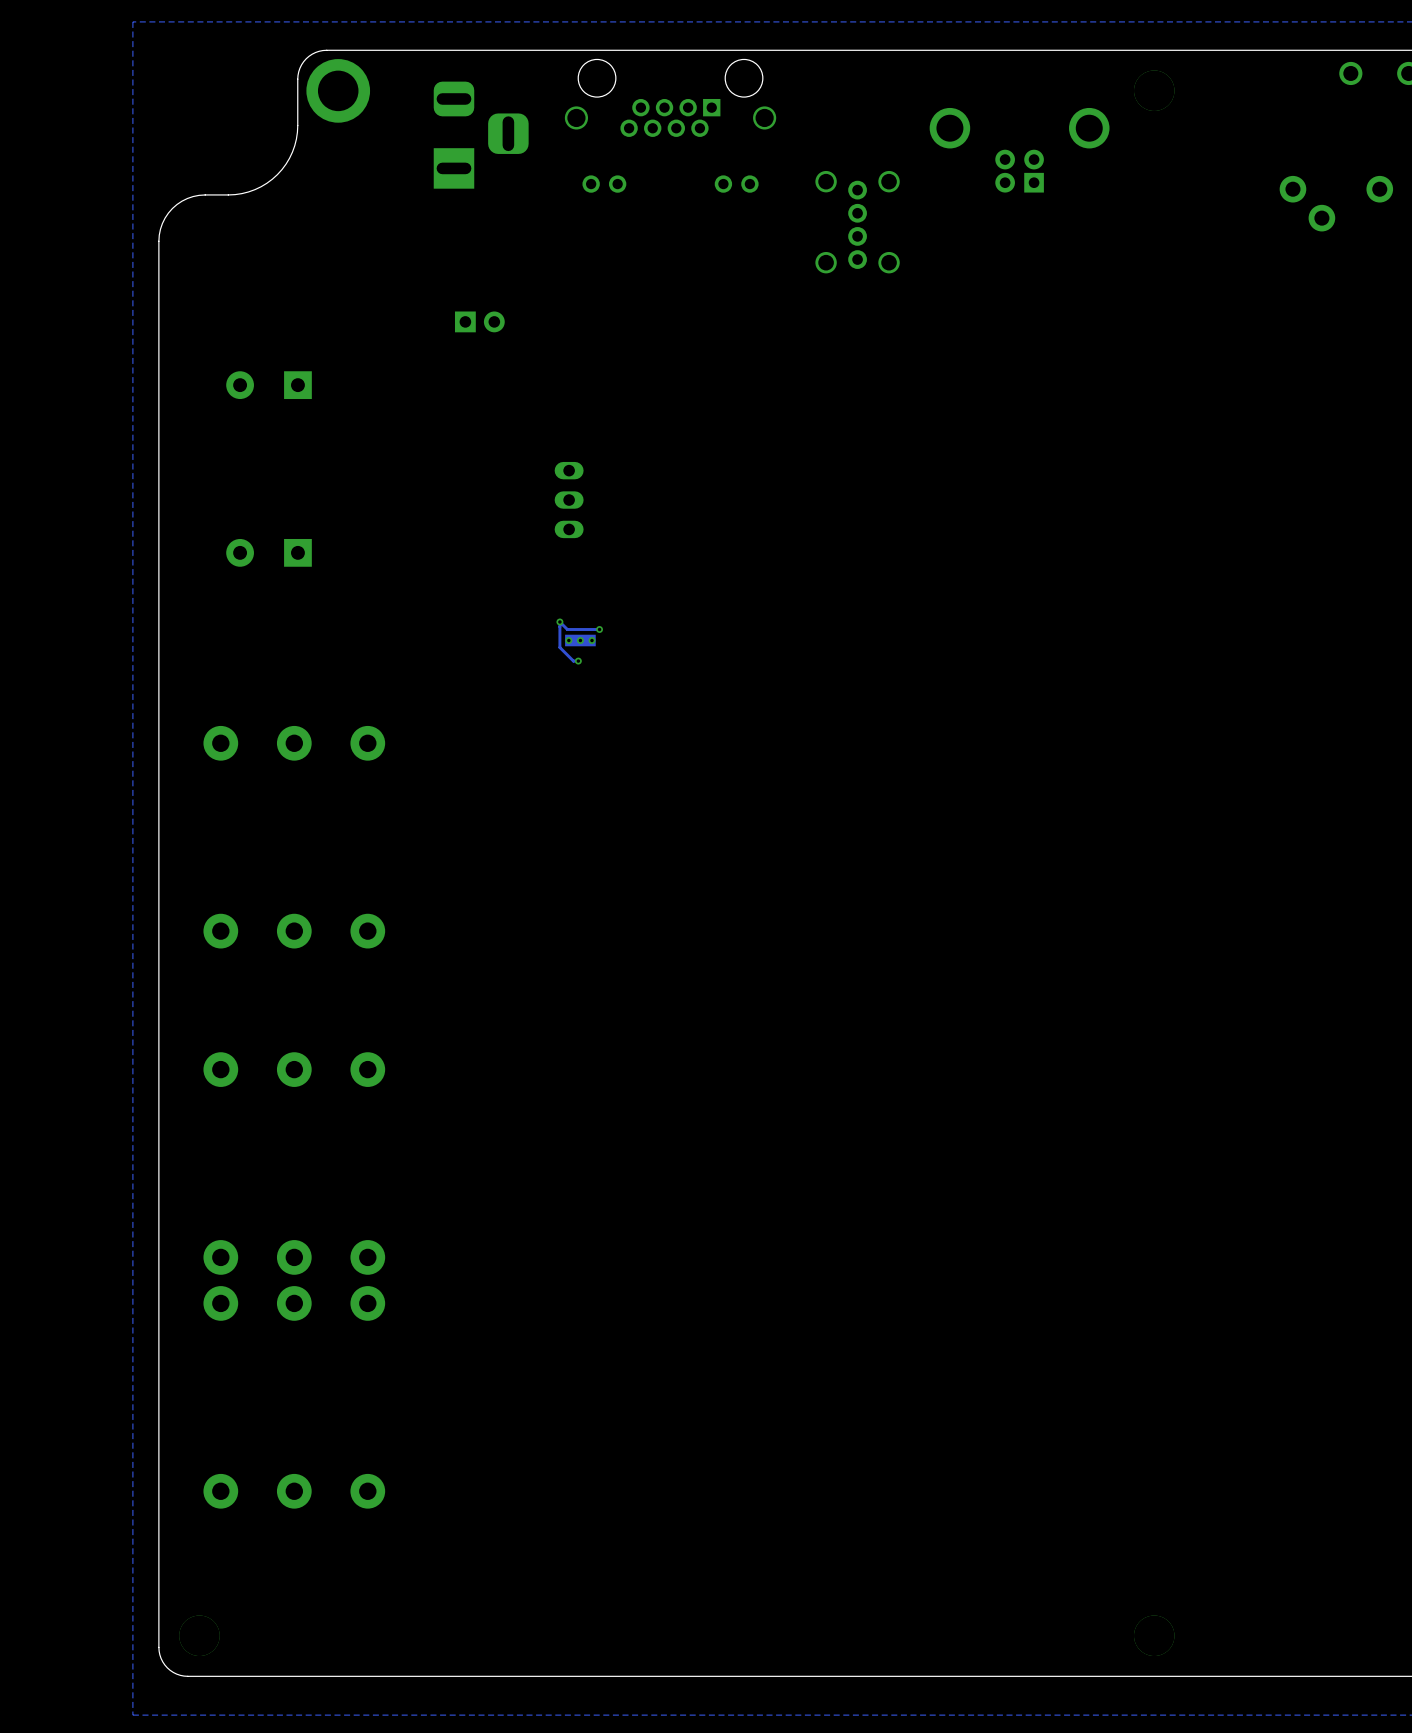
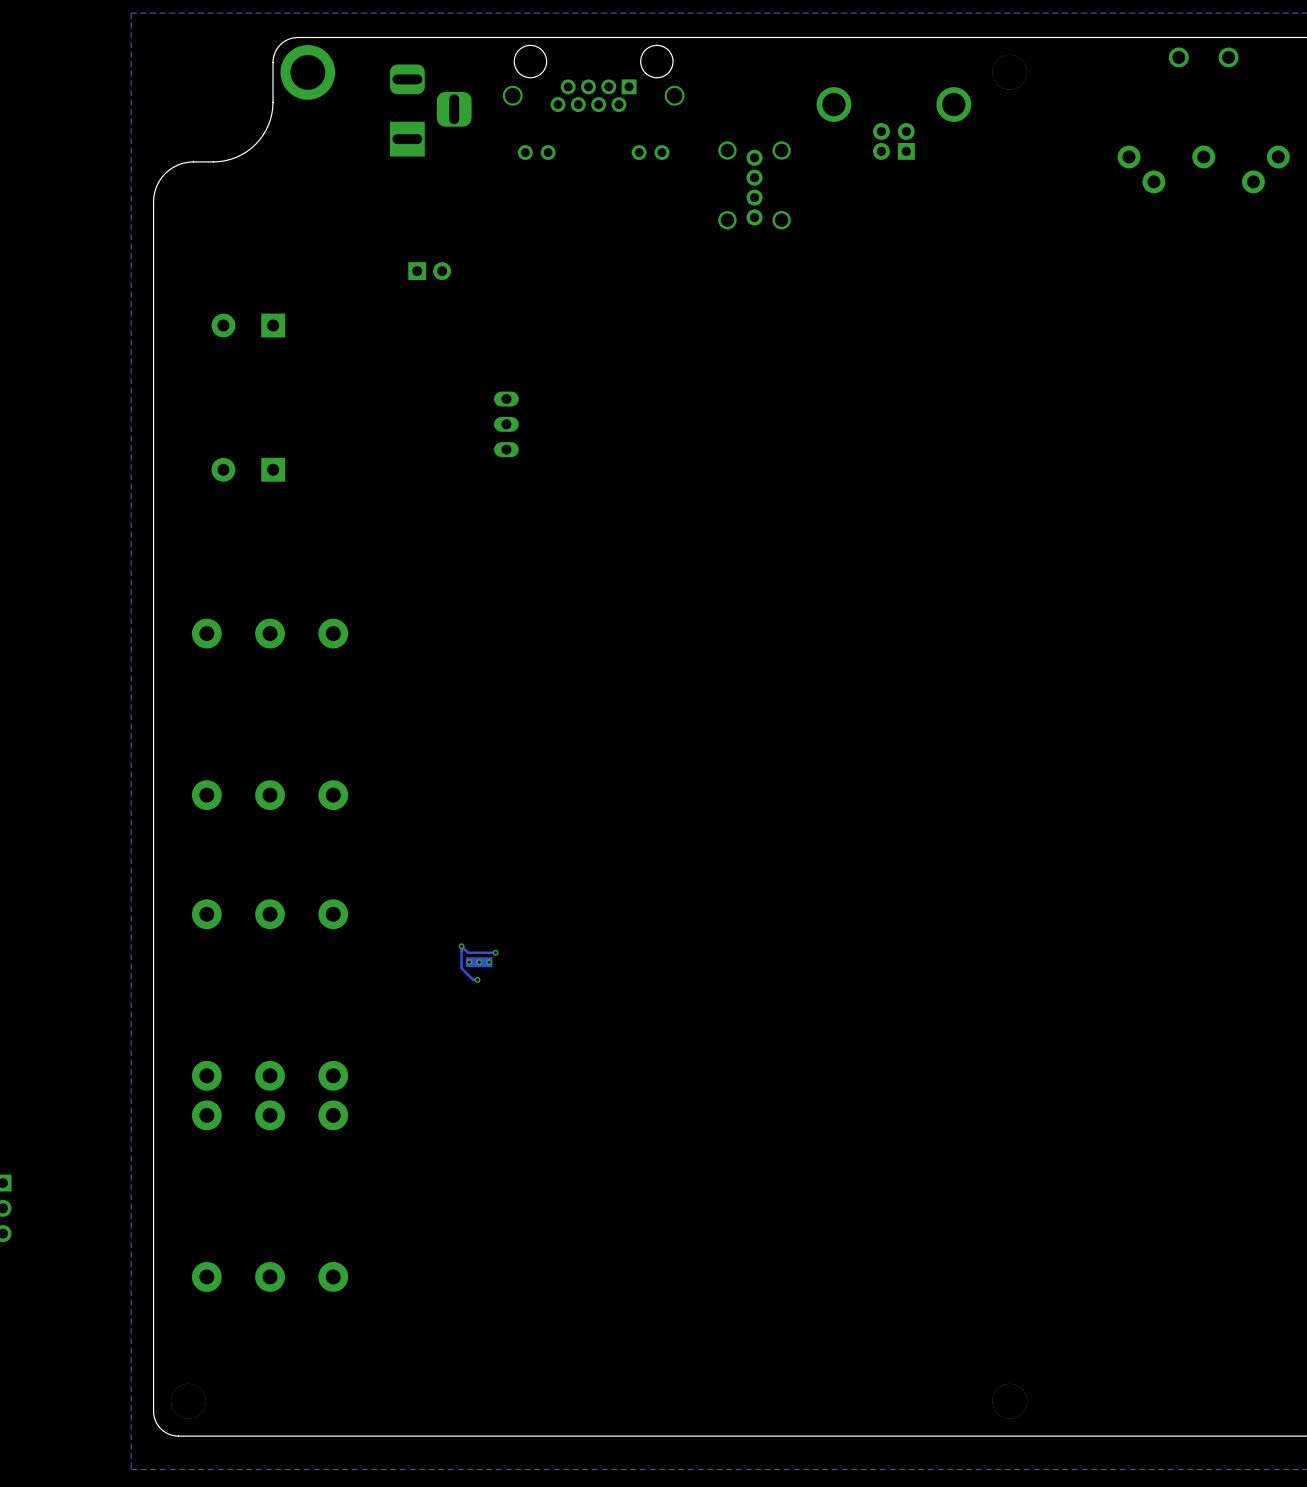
via: (559, 621) -> none
track: (599, 629) (567, 629) (559, 621) (559, 647) (573, 661) (578, 661) -> none
via: (599, 629) -> none
part: (580, 640) -> none
via: (578, 661) -> none
via: none -> (461, 946)
track: none -> (495, 952) (468, 952) (461, 946) (461, 968) (473, 979) (477, 979)
via: none -> (495, 952)
part: none -> (479, 962)
via: none -> (477, 979)

